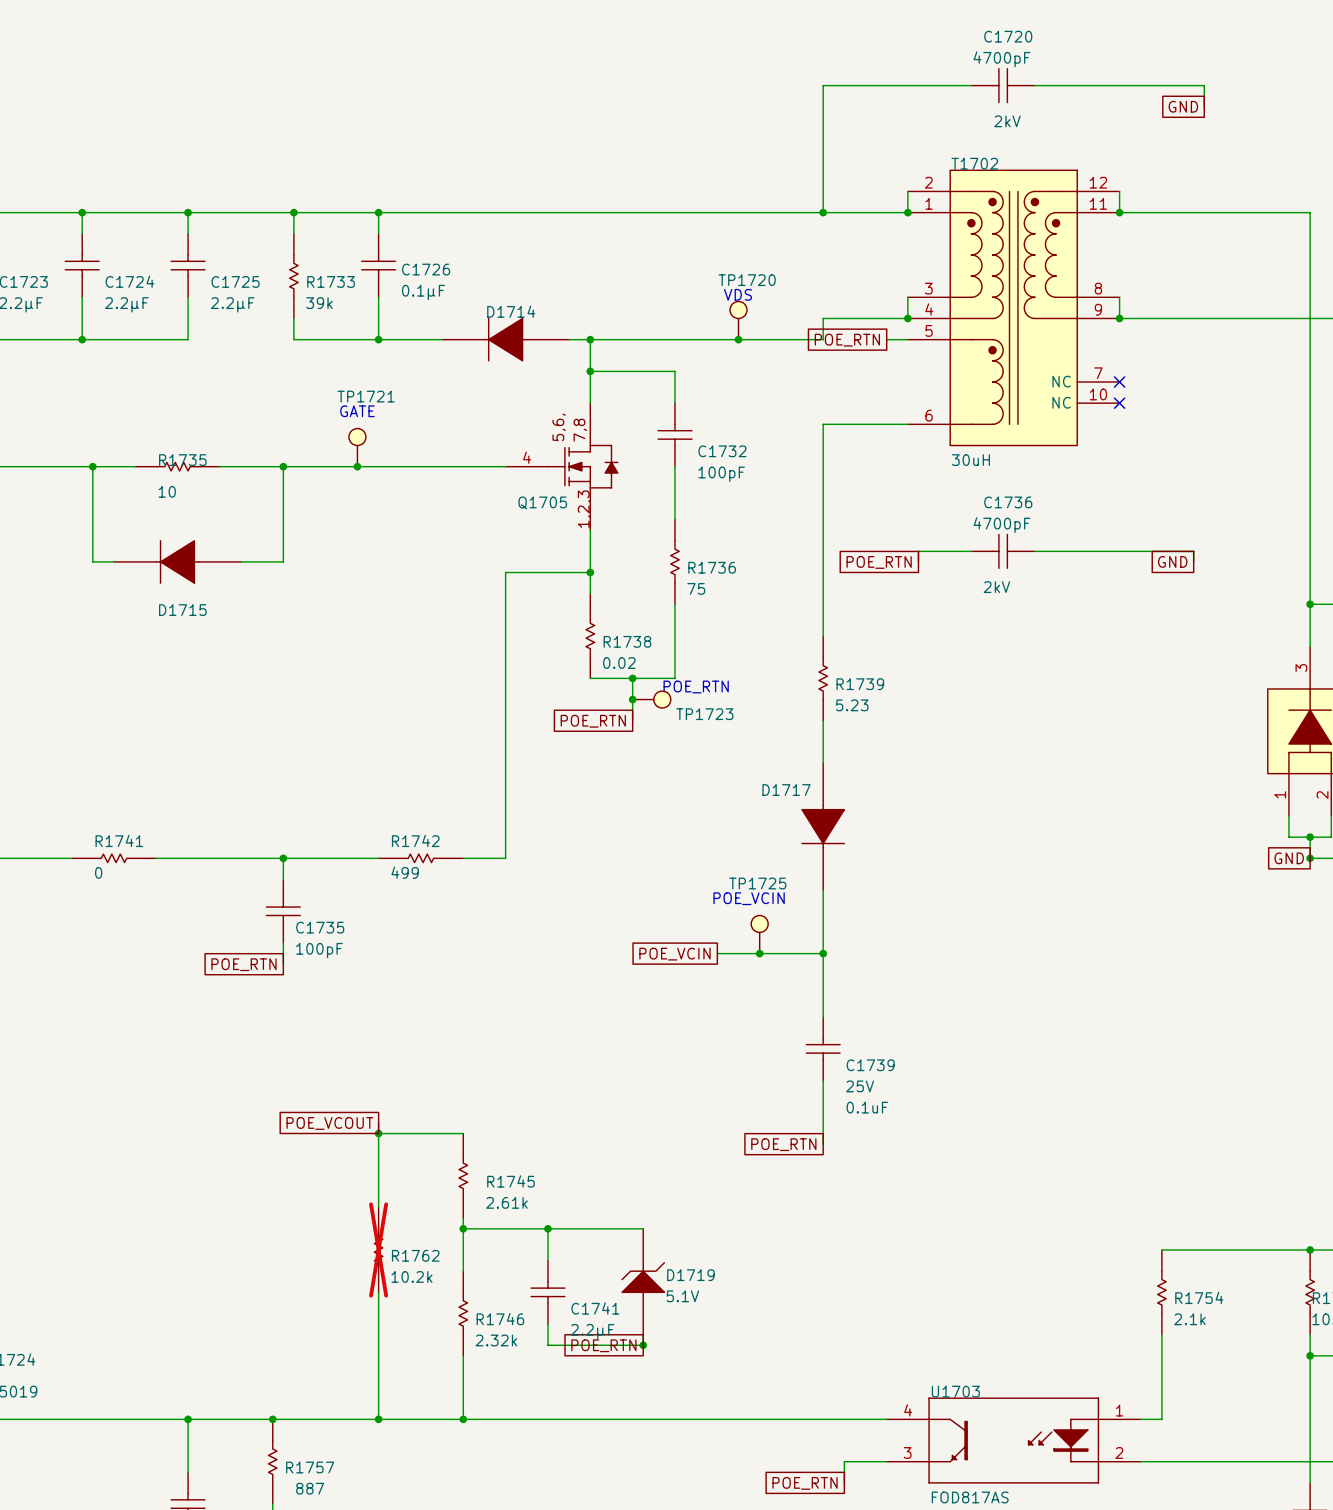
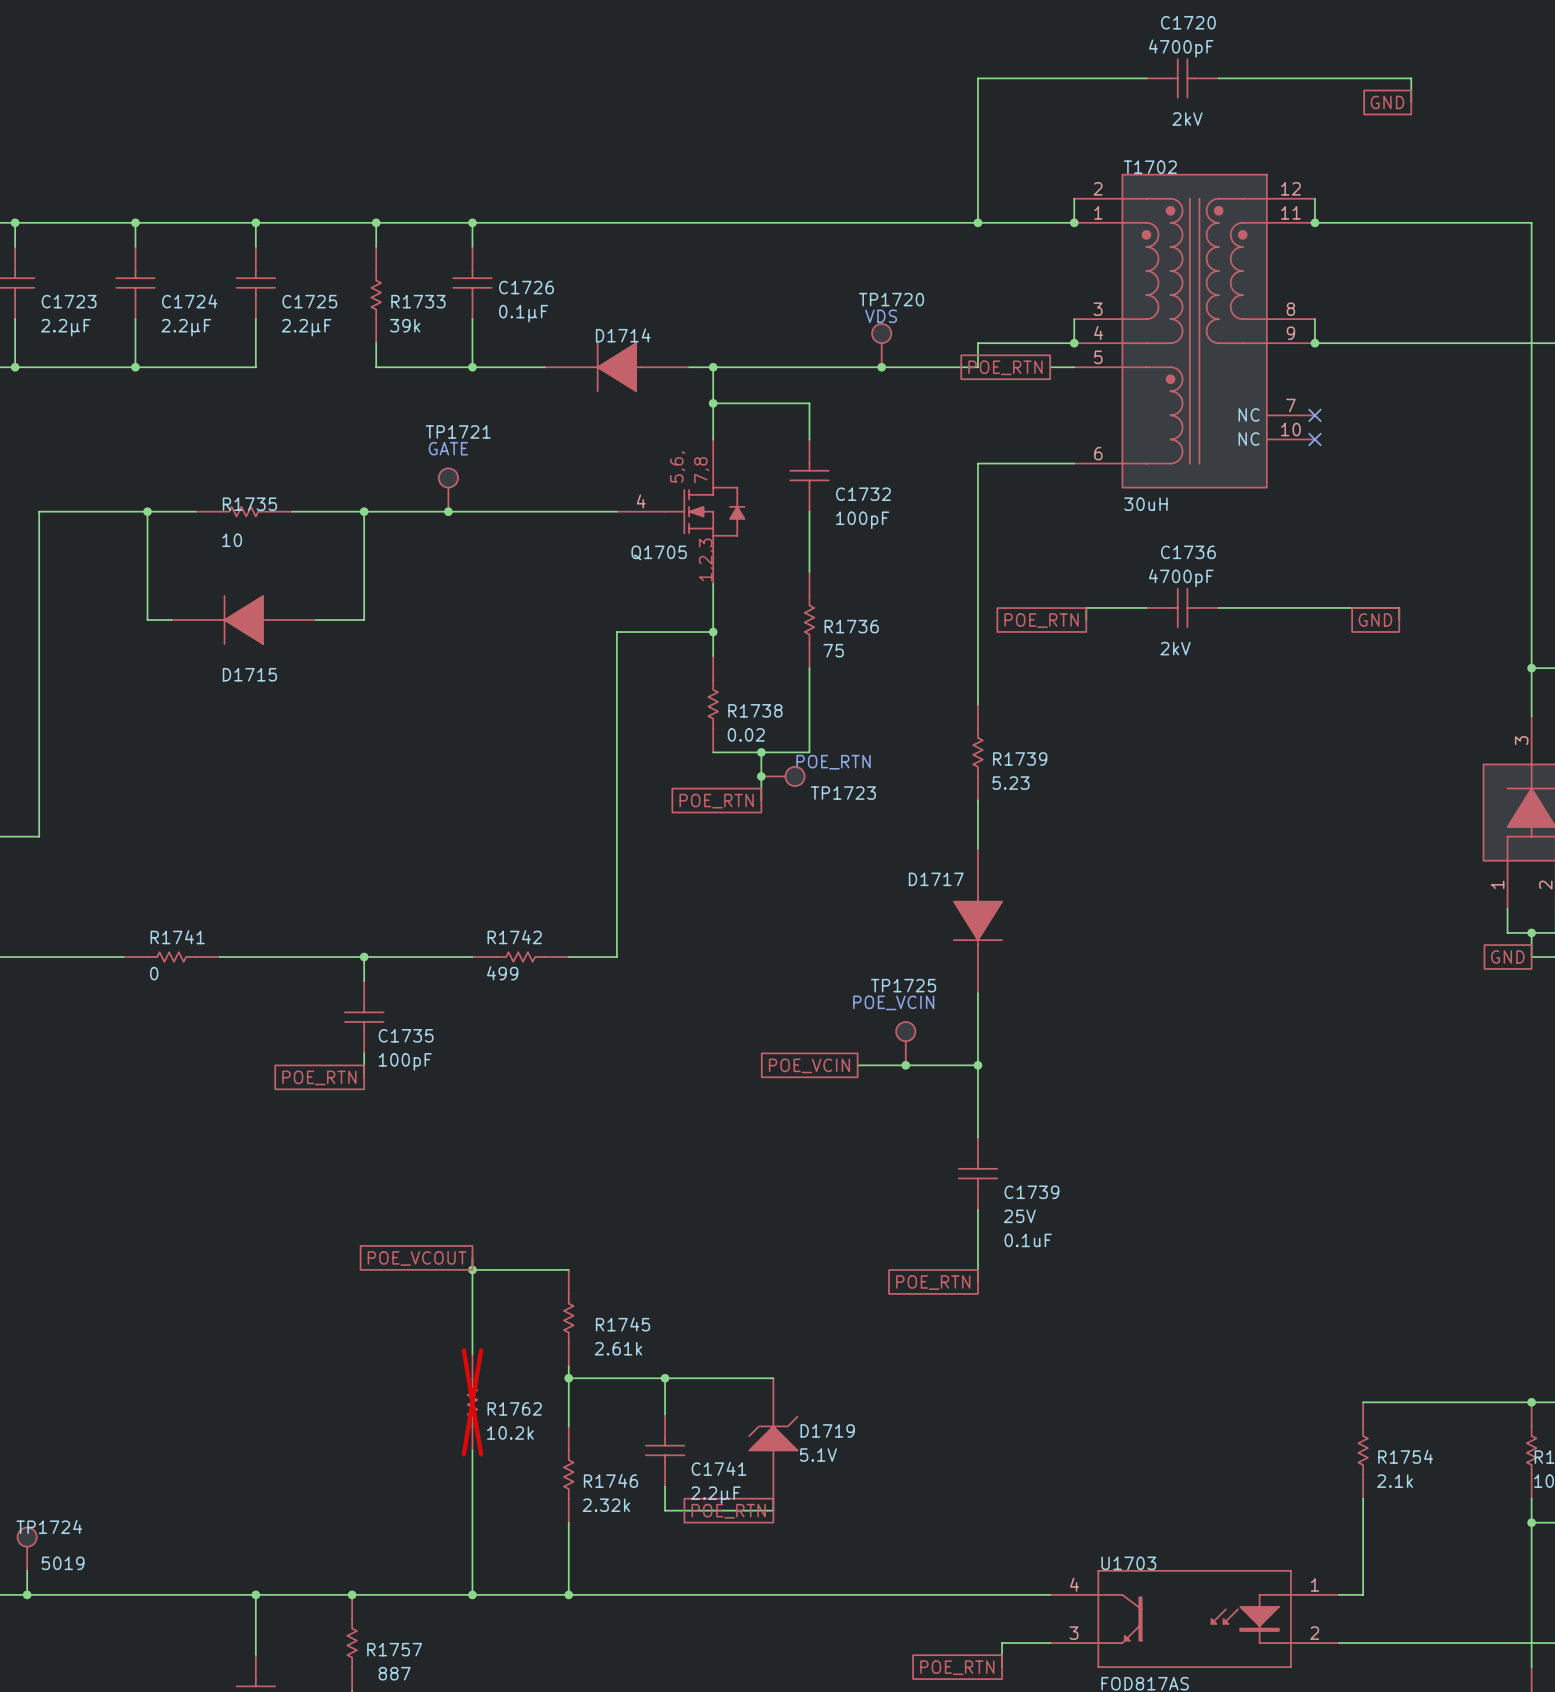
junction: (1310, 858) -> none
junction: (643, 1345) -> none

